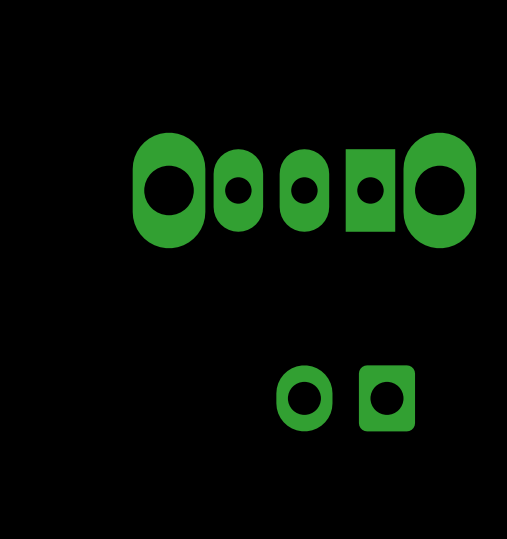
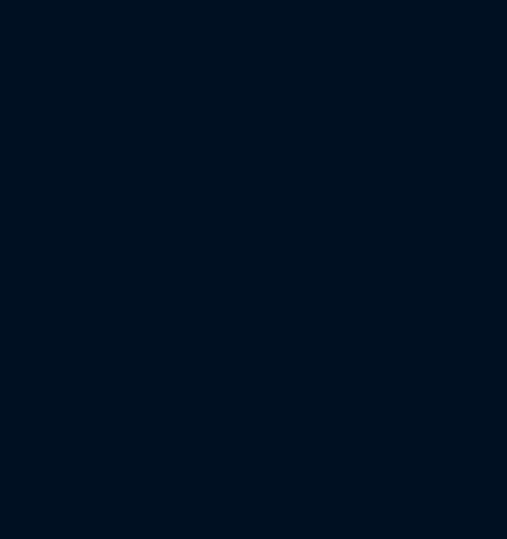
part: (304, 190) -> none
part: (345, 398) -> none

